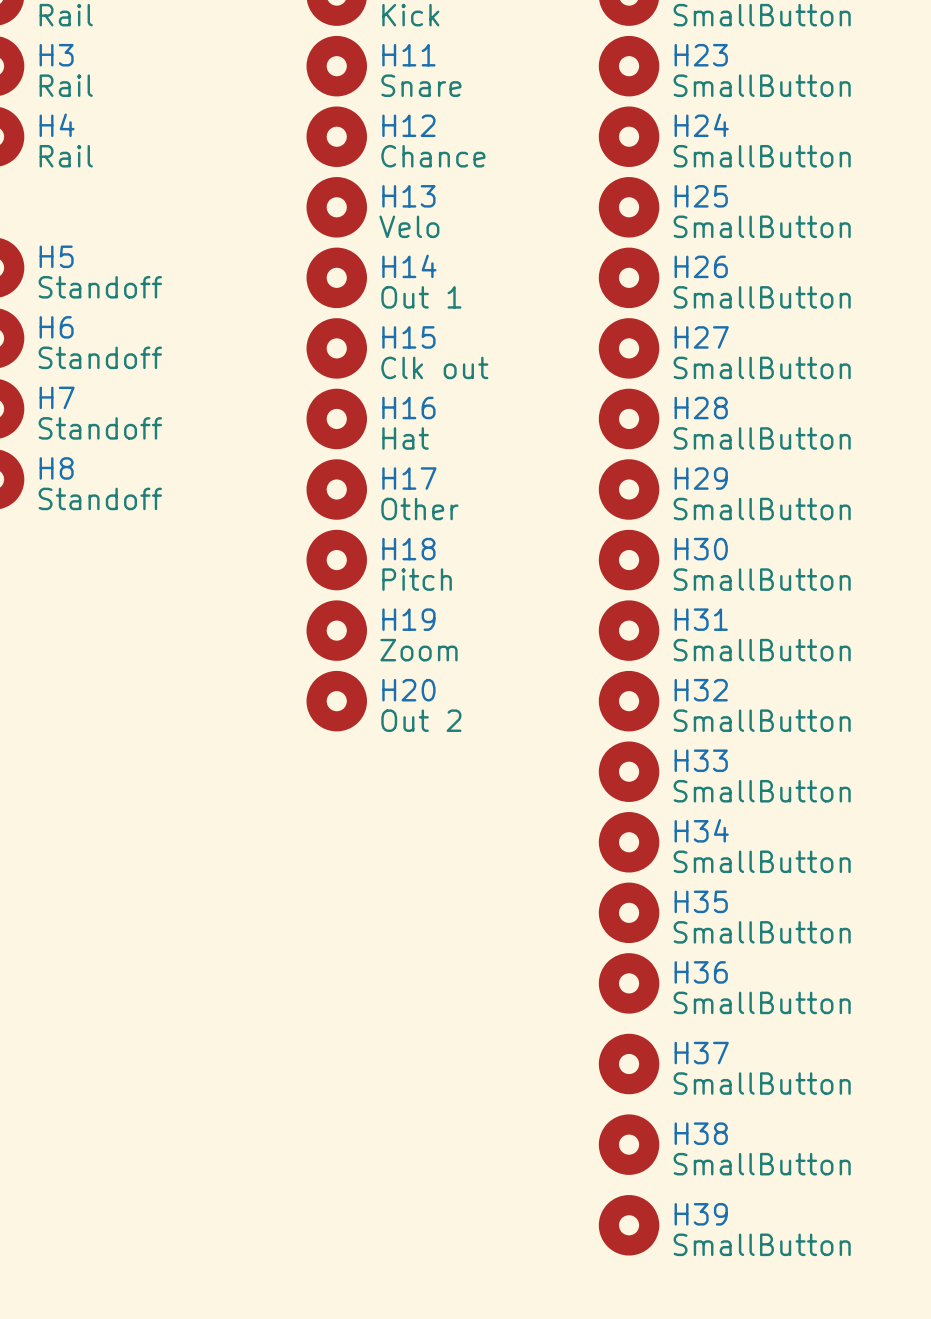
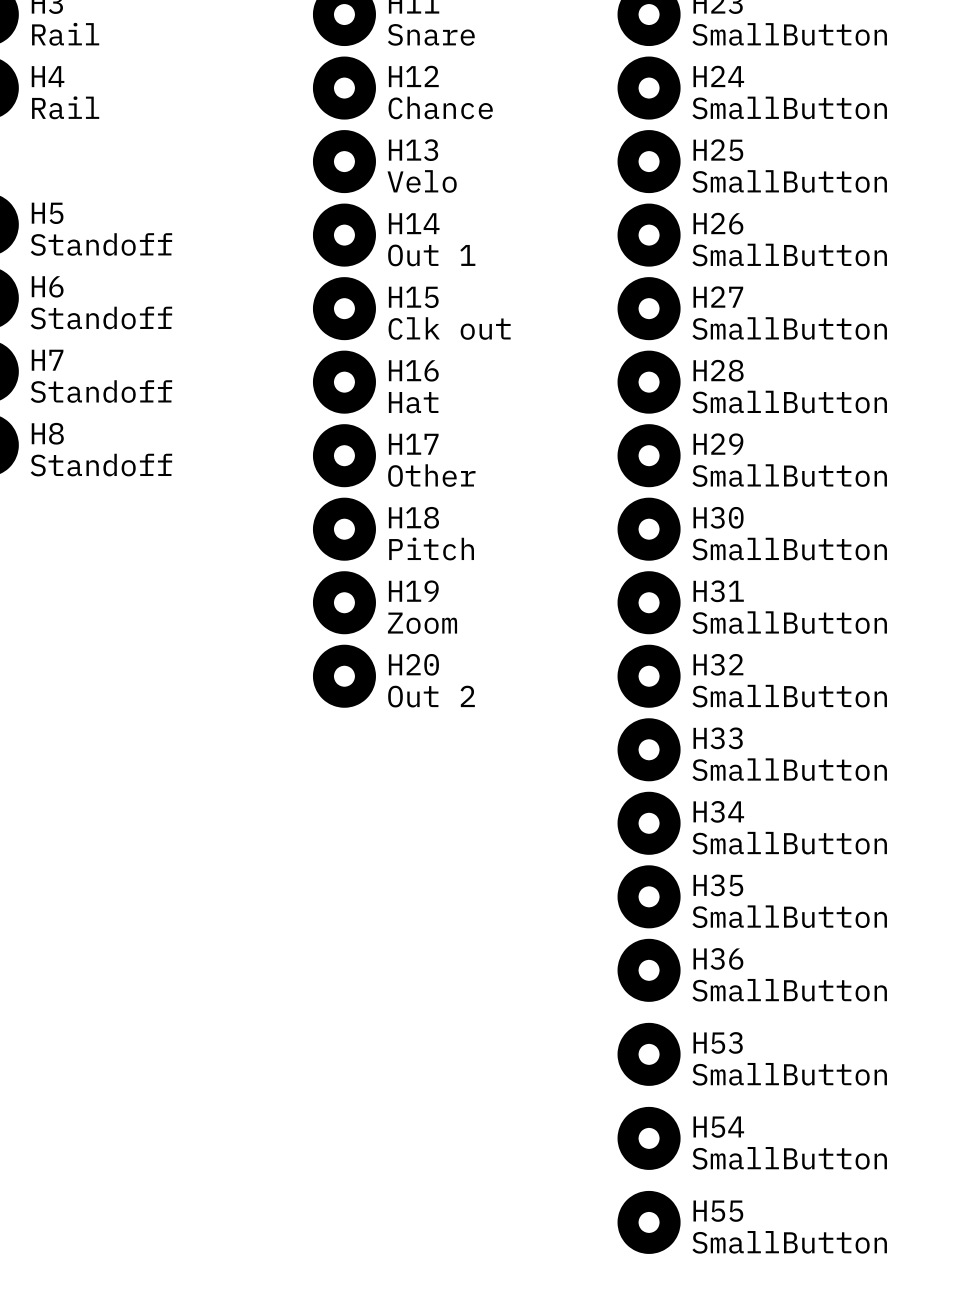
H37 name: H37 (701, 1053) -> H53 (718, 1042)
H38 name: H38 (701, 1133) -> H54 (718, 1127)
H39 name: H39 (701, 1214) -> H55 (718, 1211)

